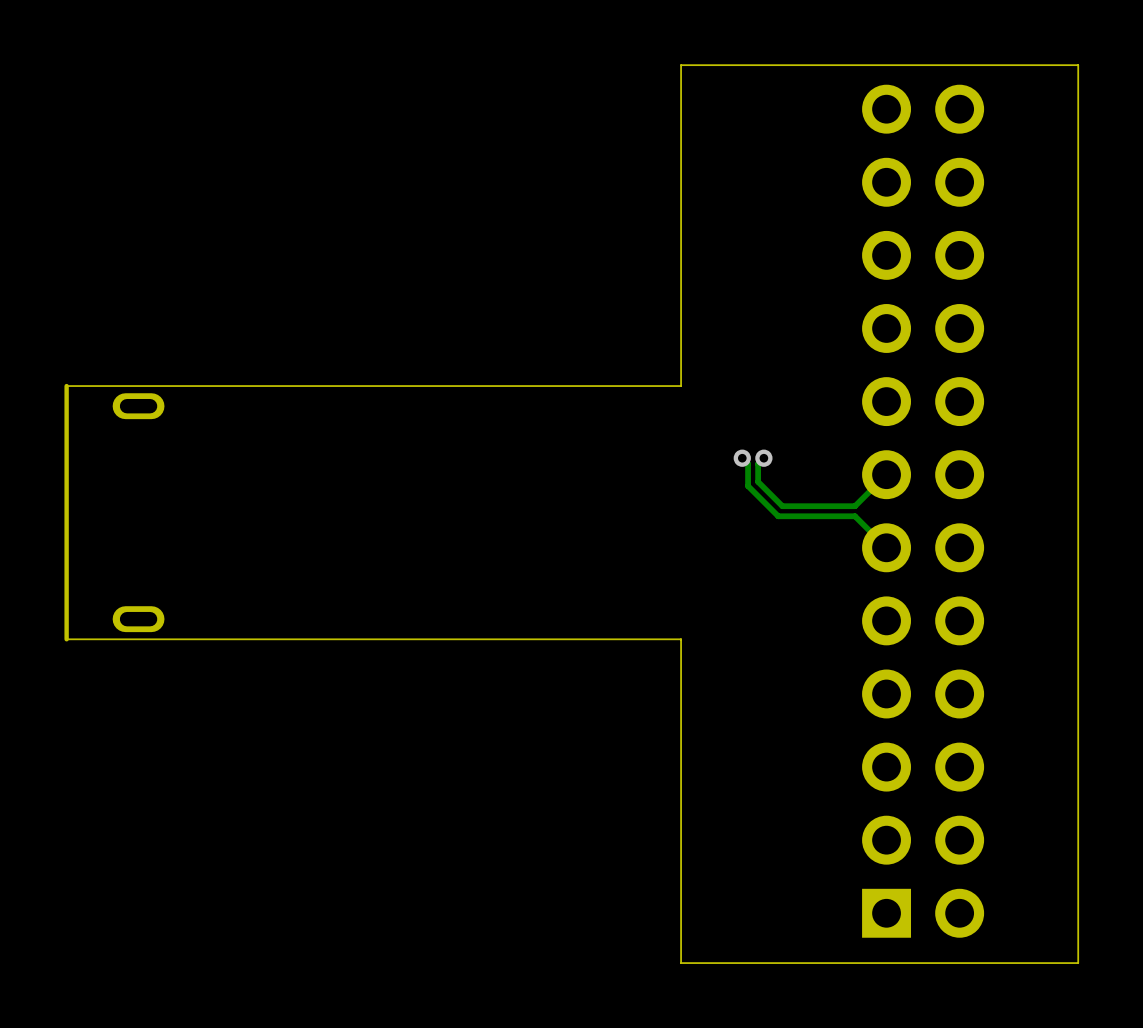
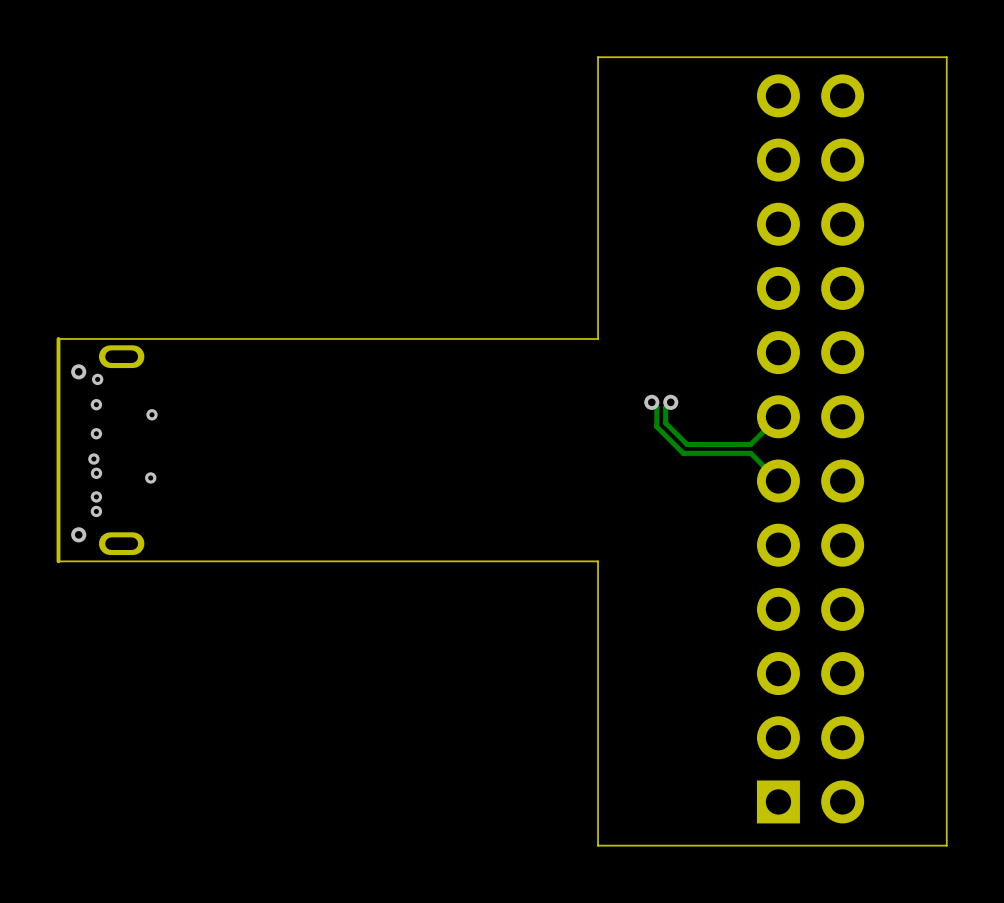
via: none -> (78, 371)
via: none -> (97, 379)
via: none -> (96, 404)
via: none -> (152, 414)
via: none -> (96, 433)
via: none -> (93, 459)
via: none -> (96, 473)
via: none -> (150, 477)
via: none -> (96, 496)
via: none -> (96, 511)
via: none -> (78, 534)

